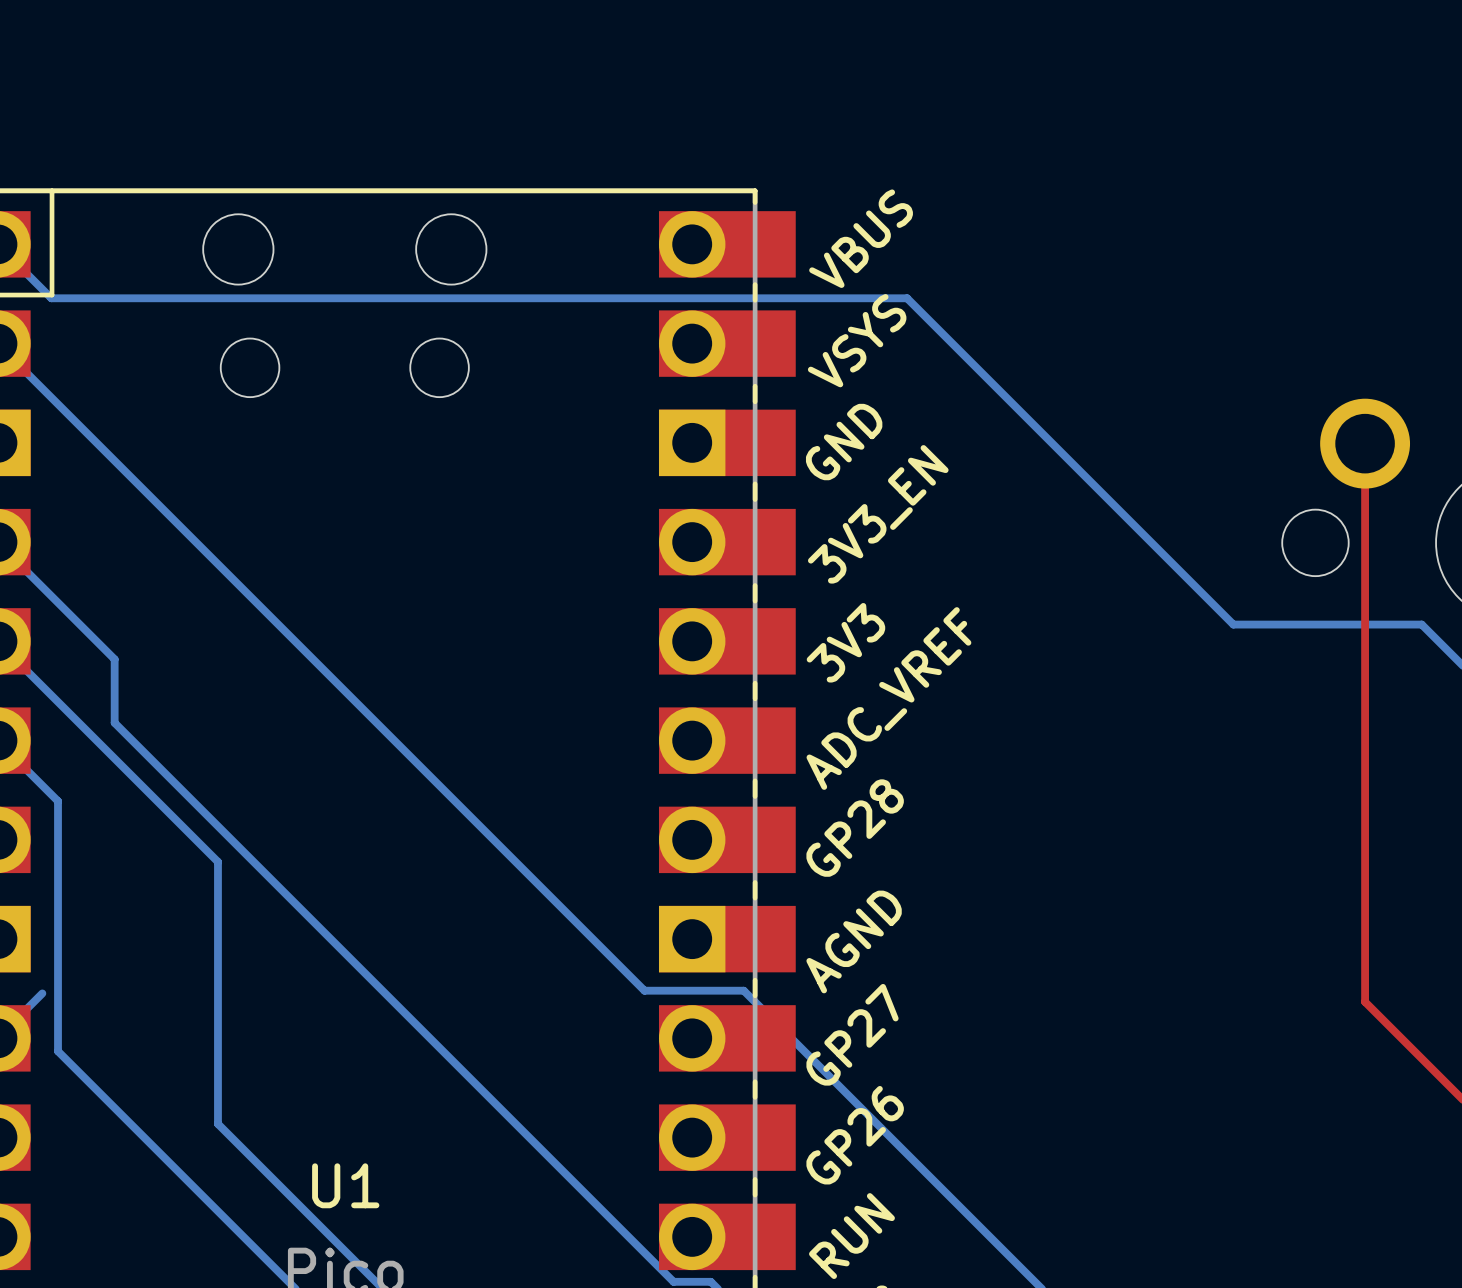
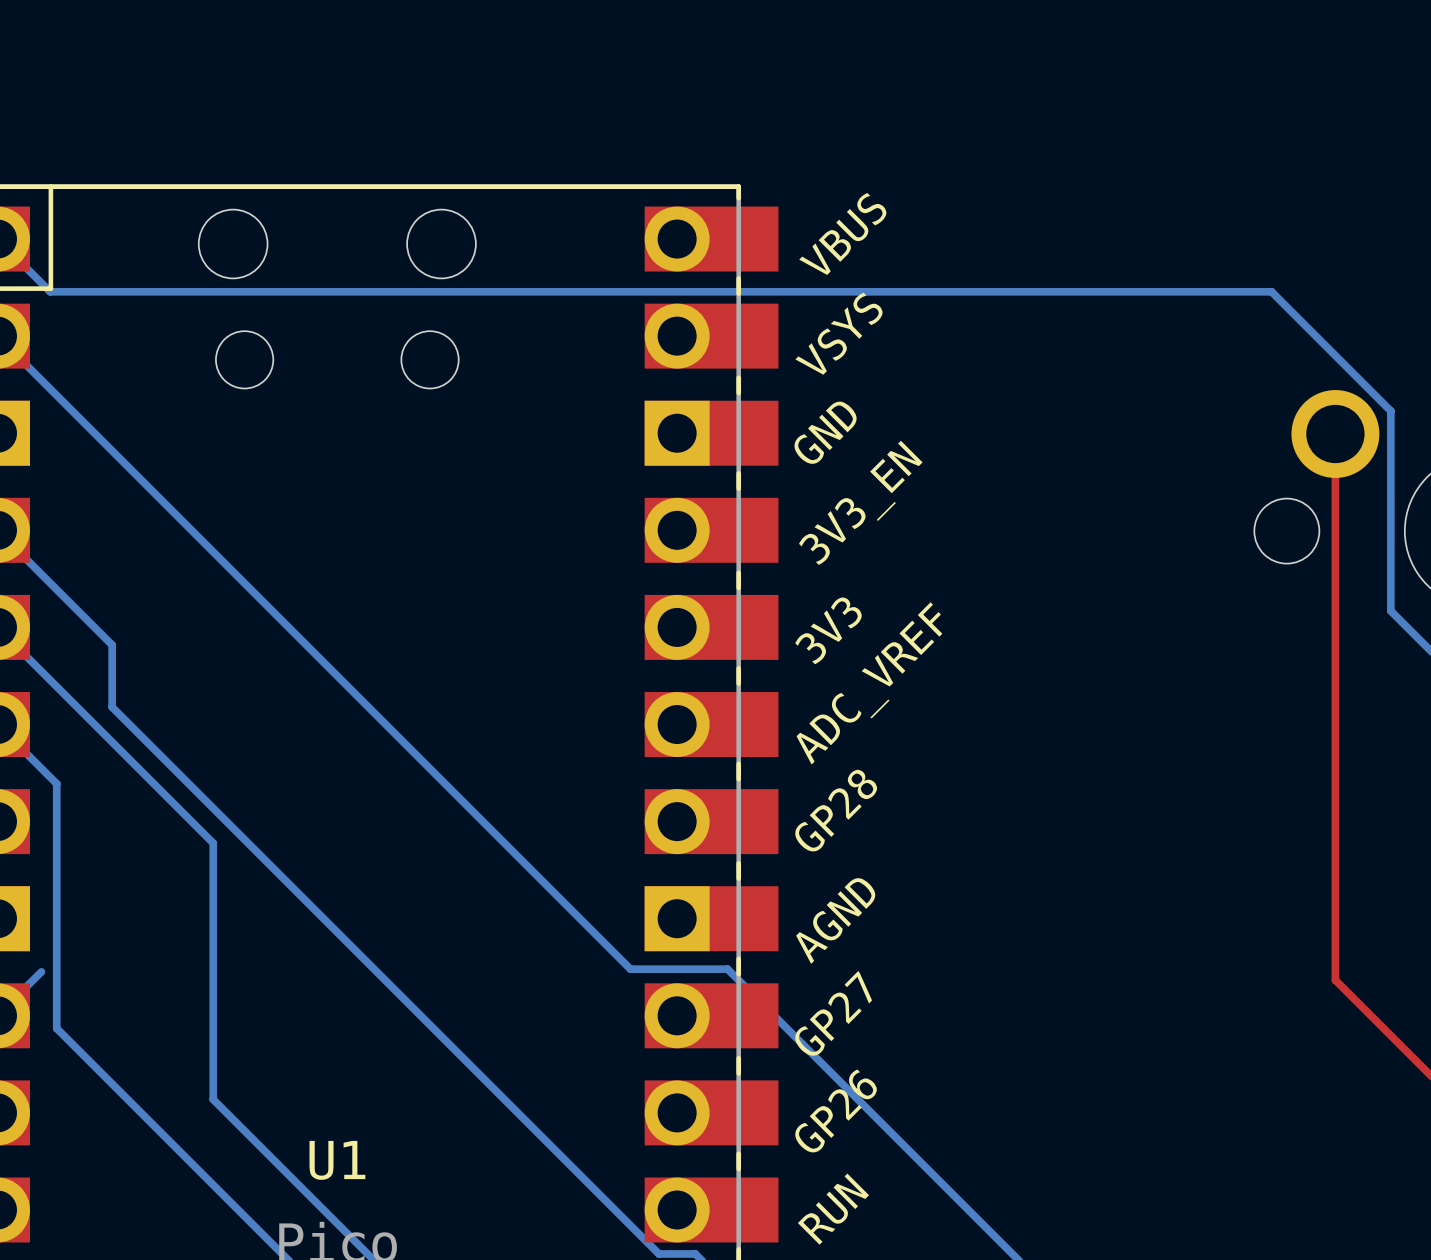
bottom track: (907, 298) (1233, 624) (1421, 624) -> (887, 291) (1271, 291) (1390, 411) (1390, 610)

